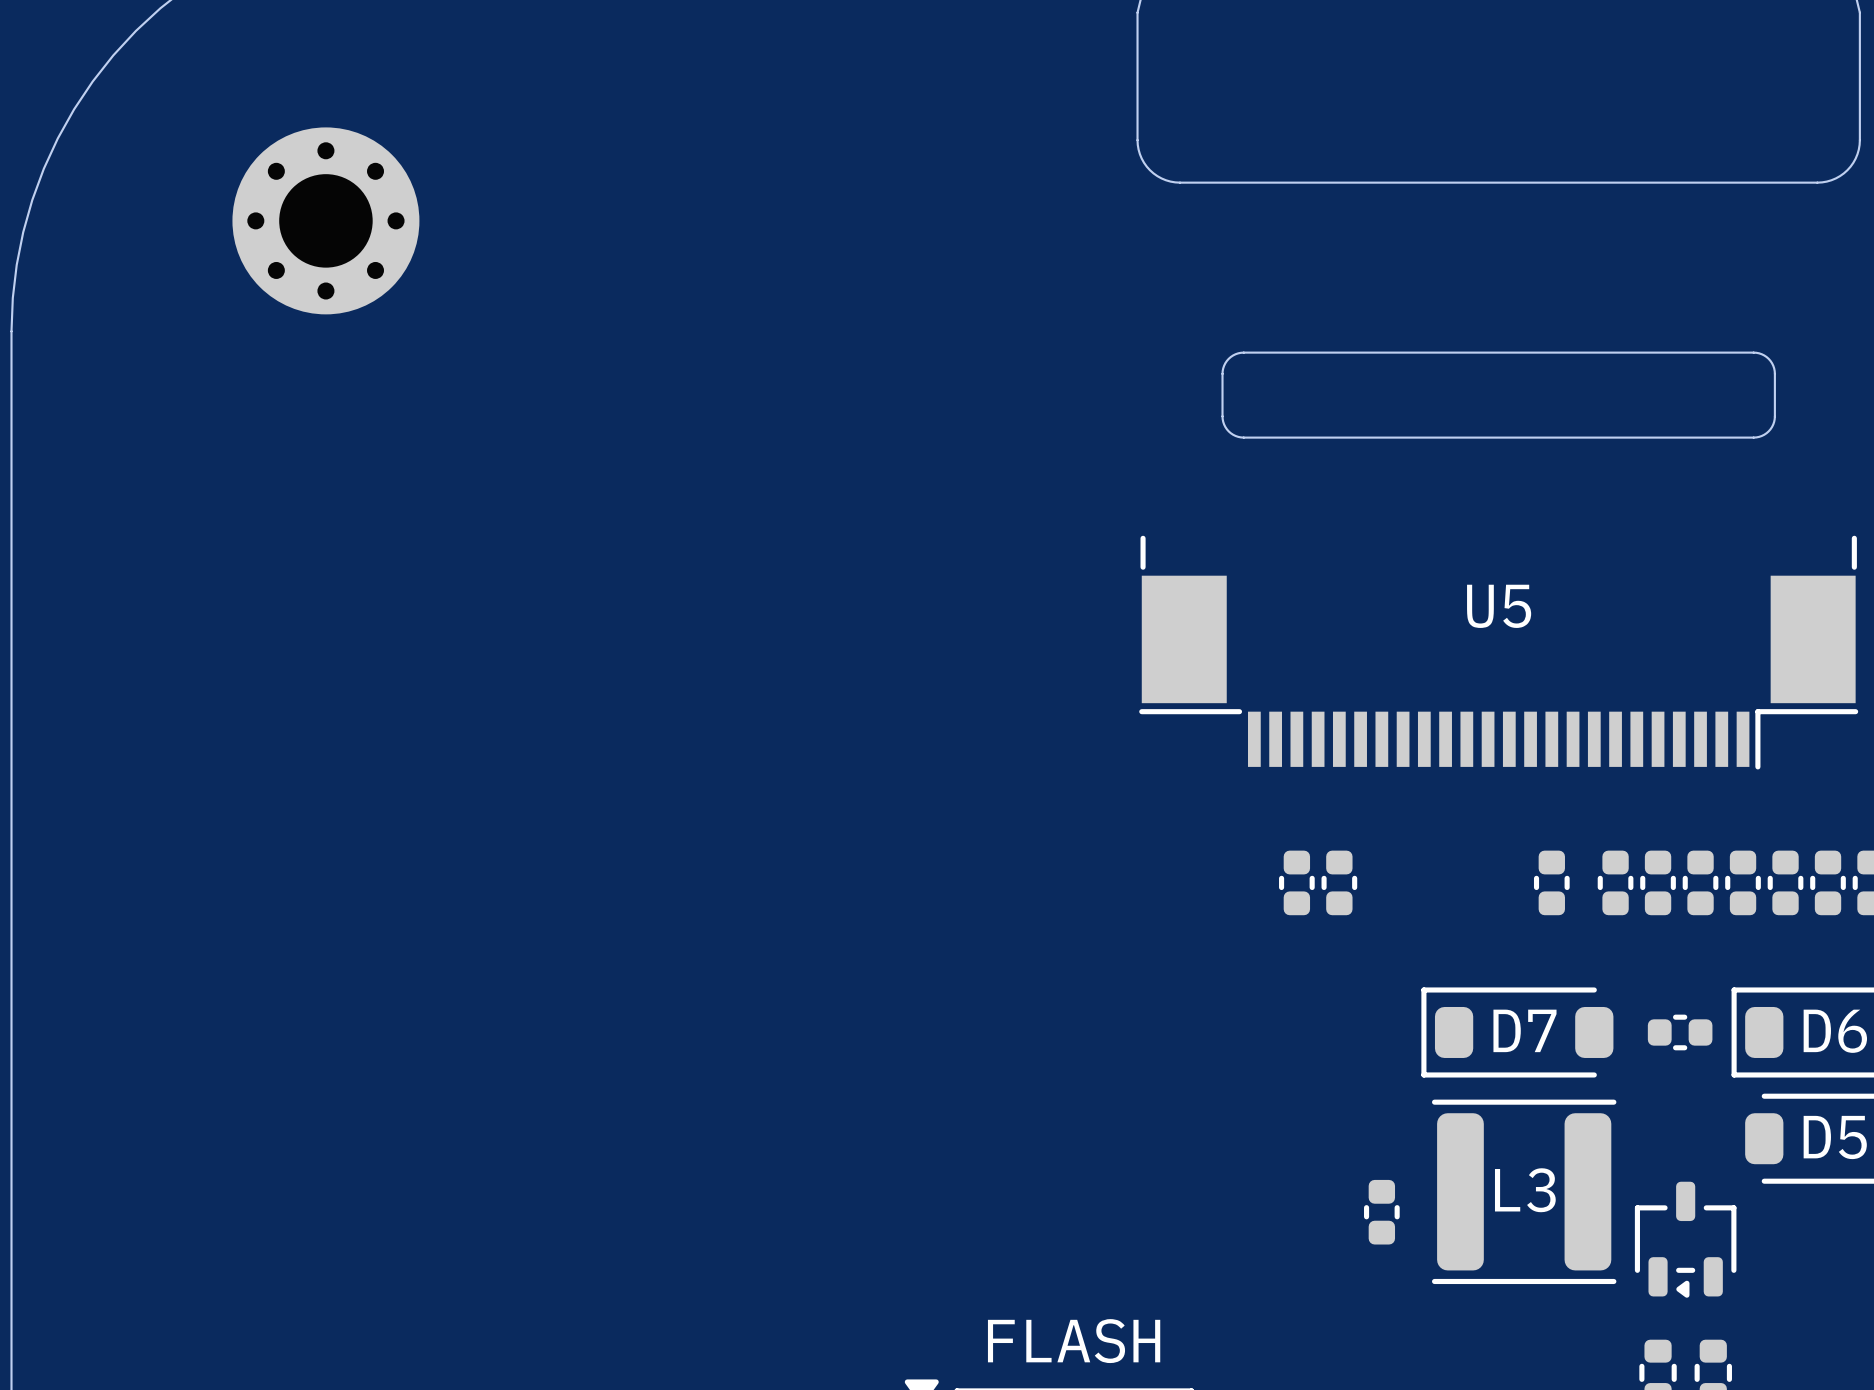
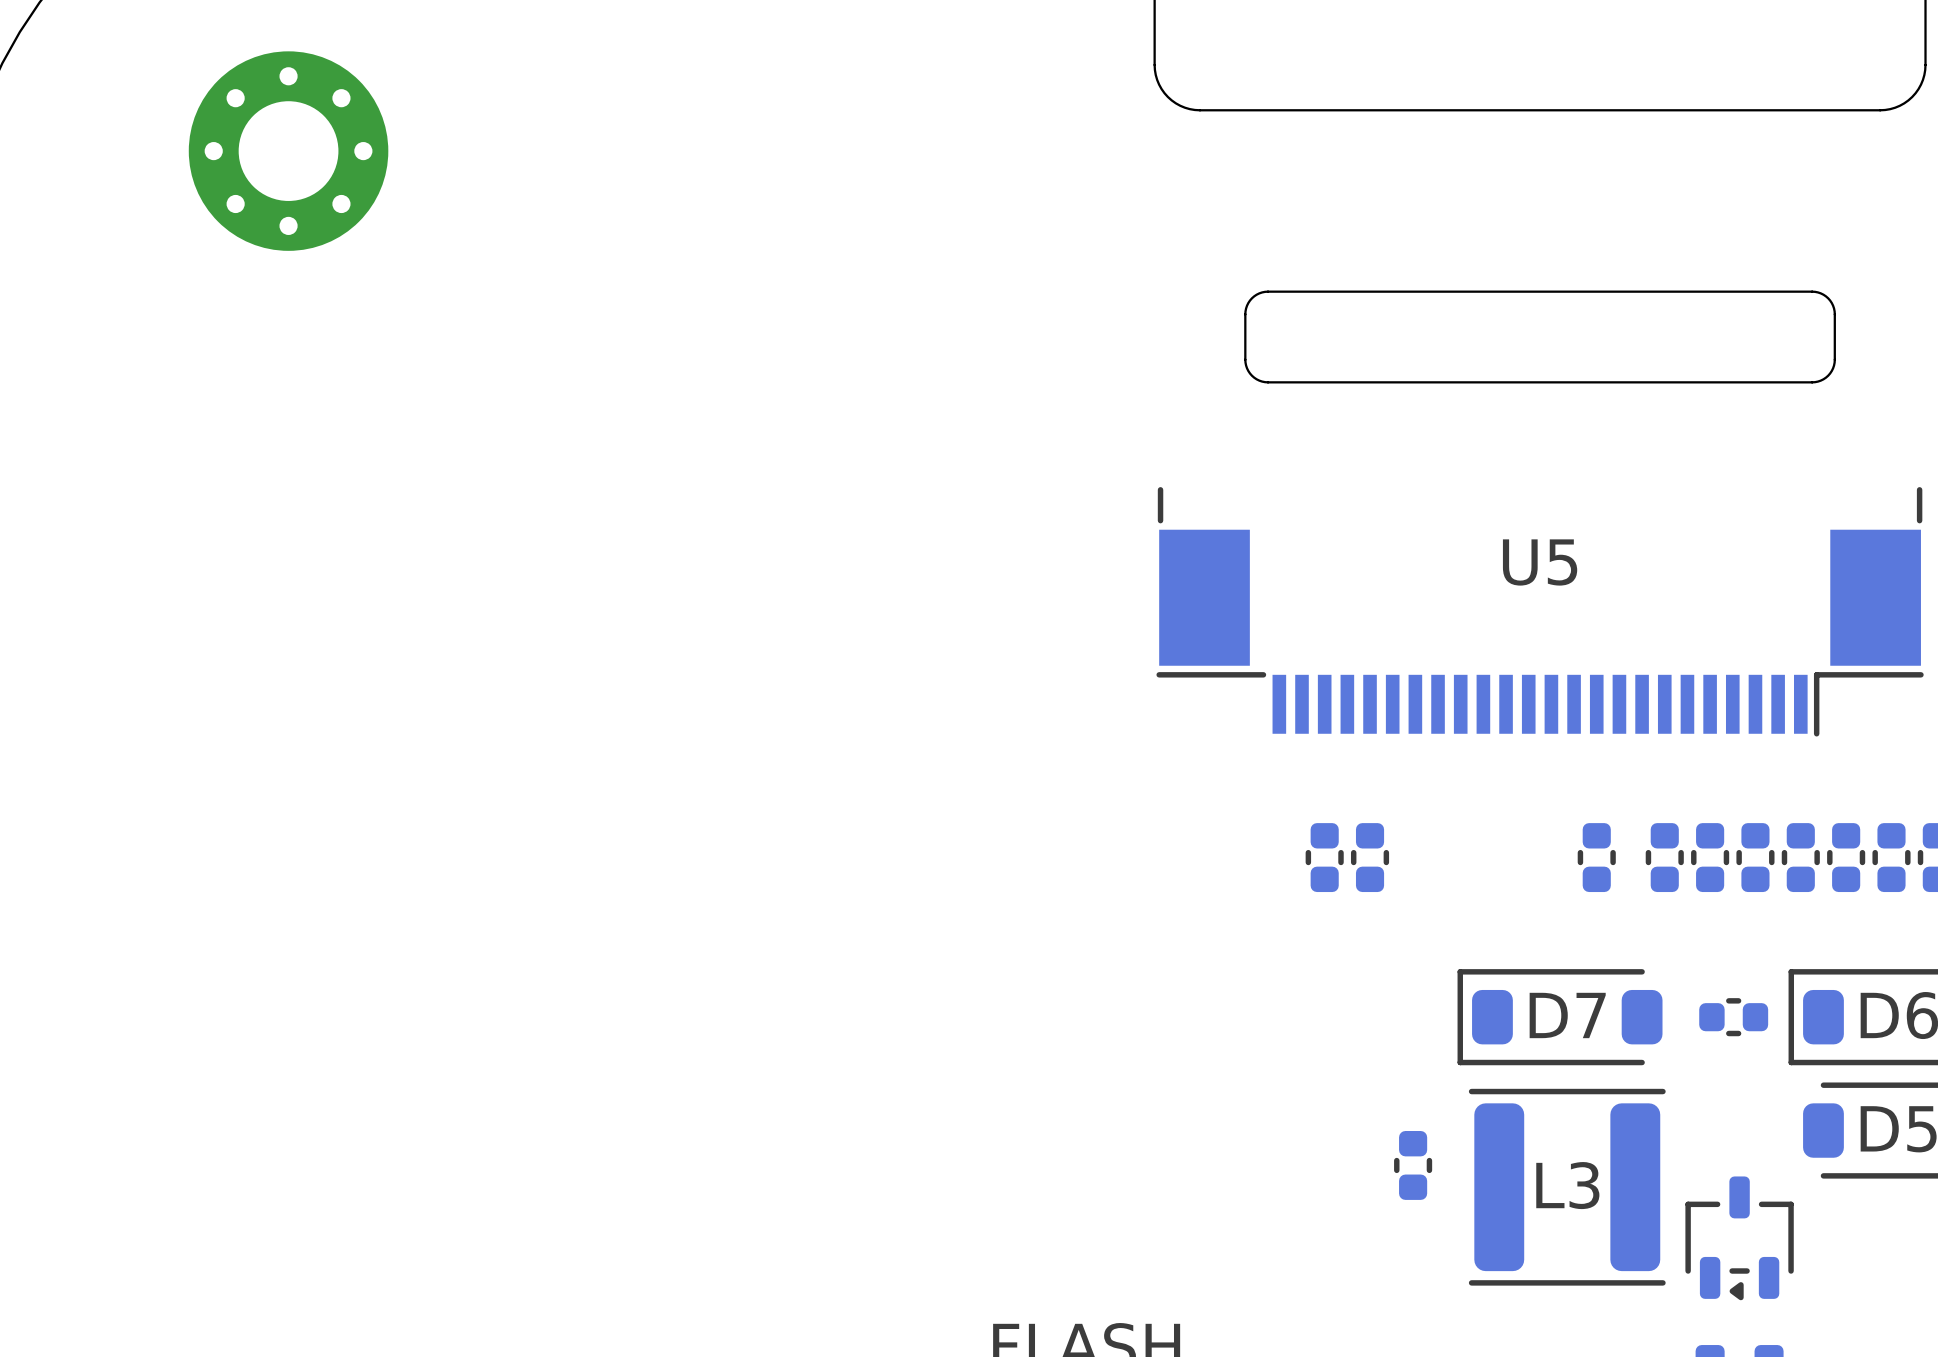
part position: (1381, 1212) -> (1413, 1165)

